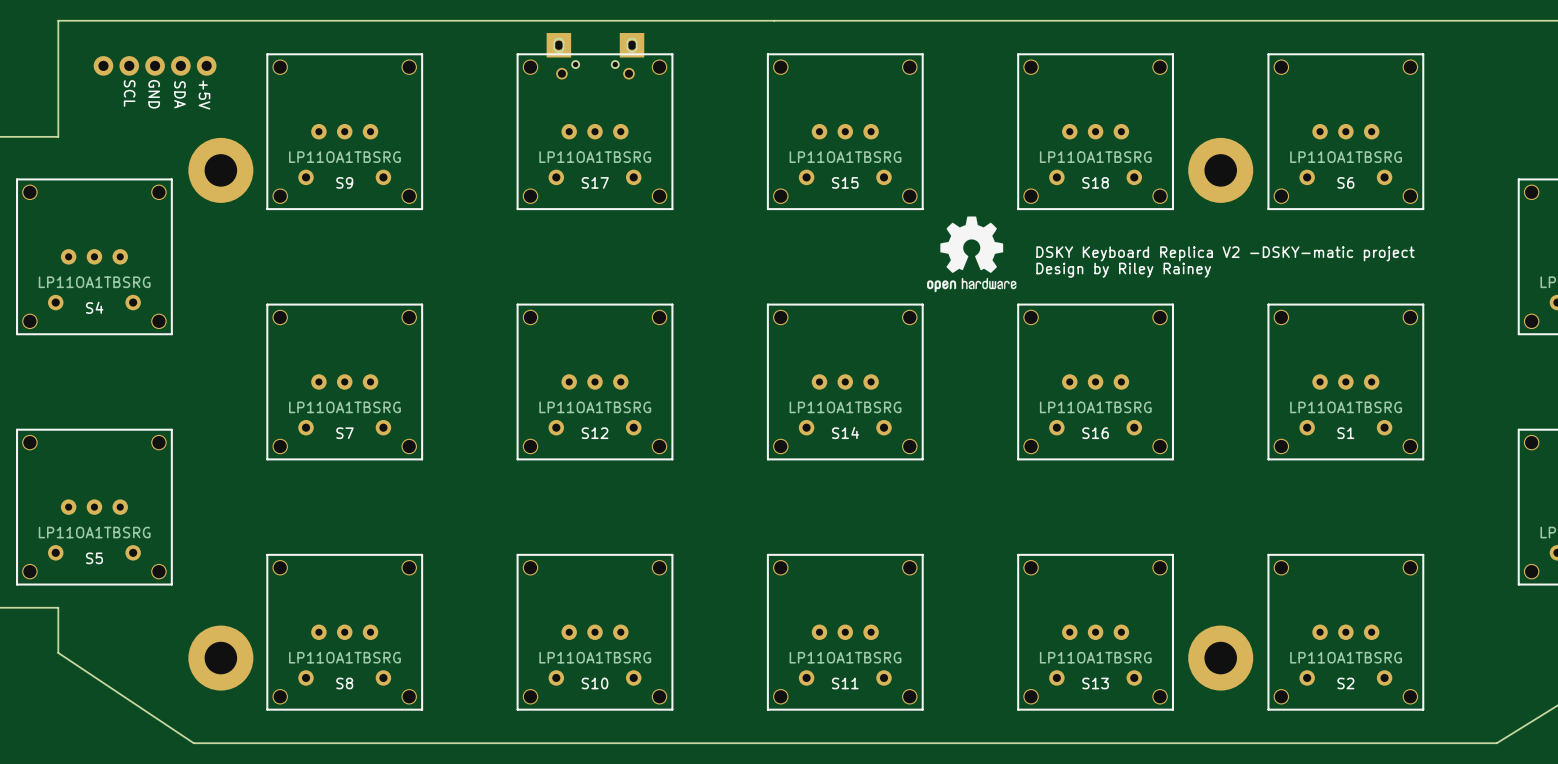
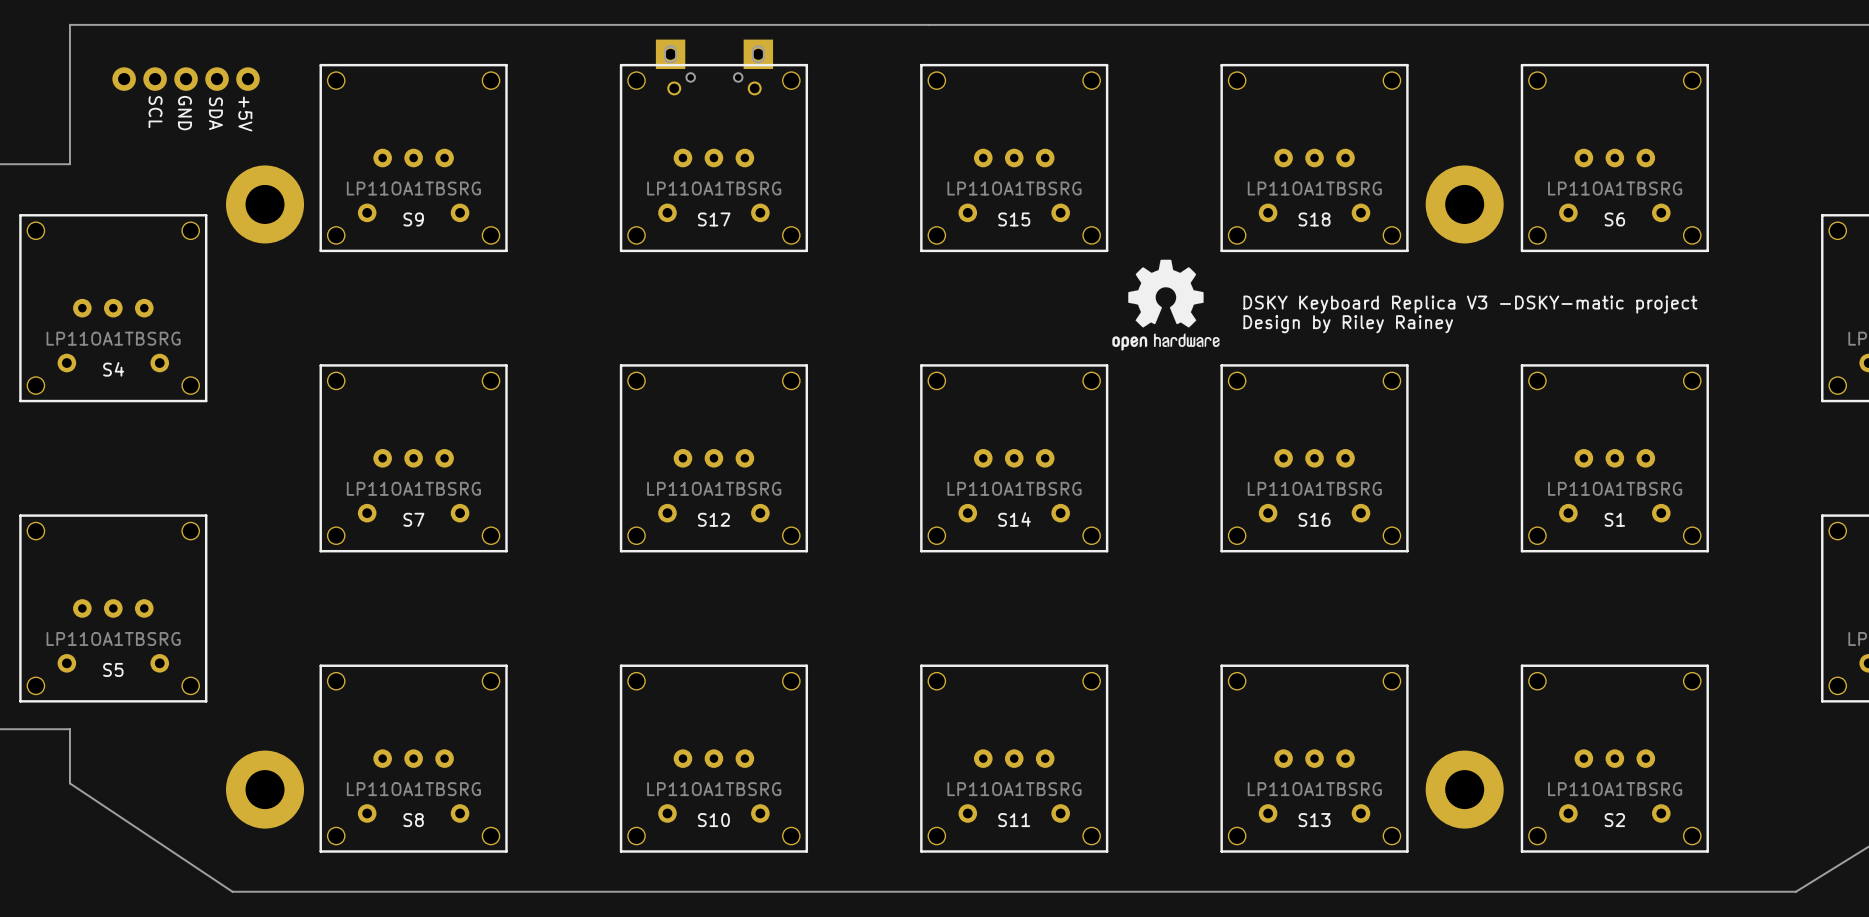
text: DSKY Keyboard Replica V2 -DSKY-matic project (1225, 253) -> DSKY Keyboard Replica V3 -DSKY-matic project (1470, 304)

